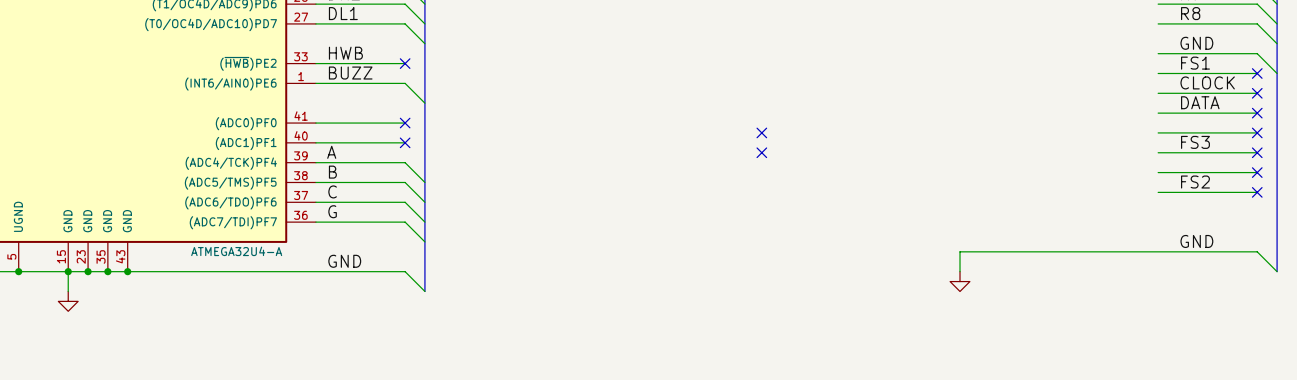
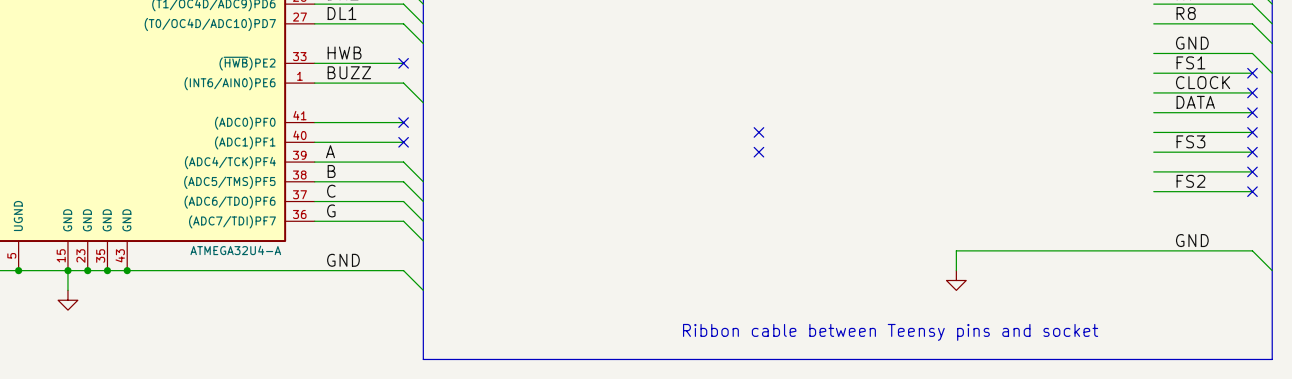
bus: none -> (1272, 270) (1272, 359) (423, 359) (423, 290)
text: none -> Ribbon cable between Teensy pins and socket (890, 332)

